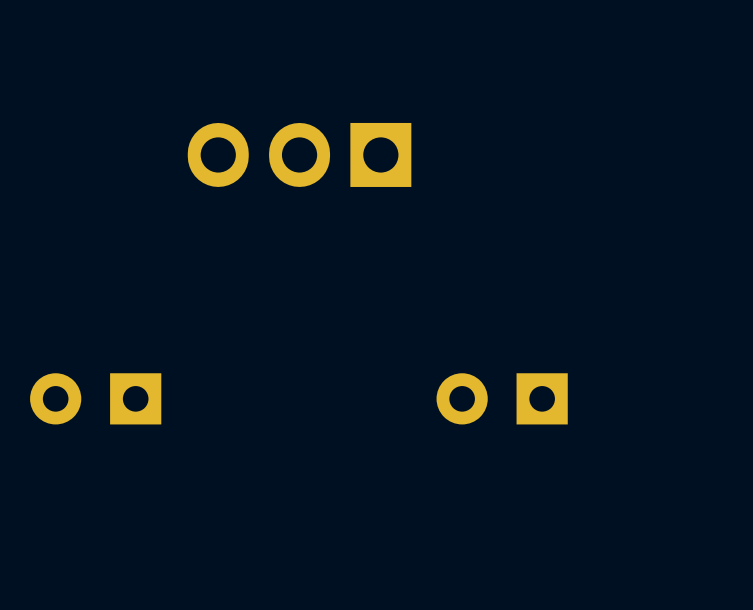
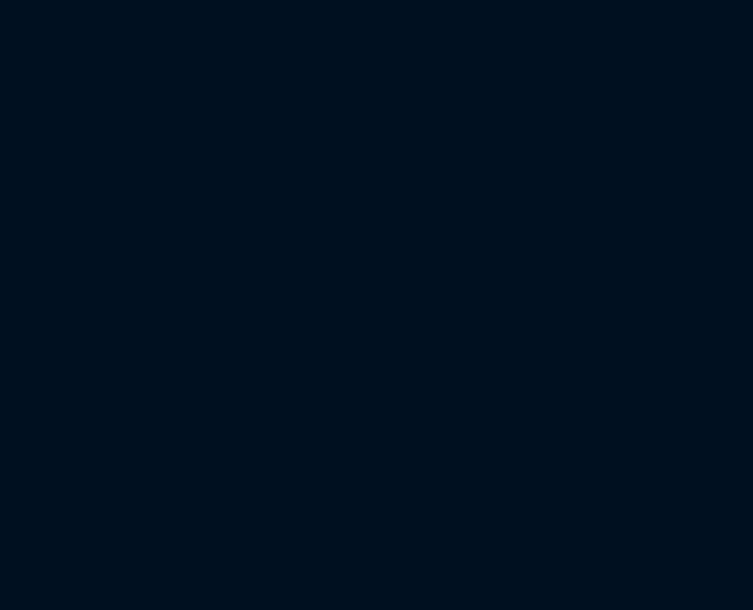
part: (299, 154) -> none
part: (95, 398) -> none
part: (502, 398) -> none

